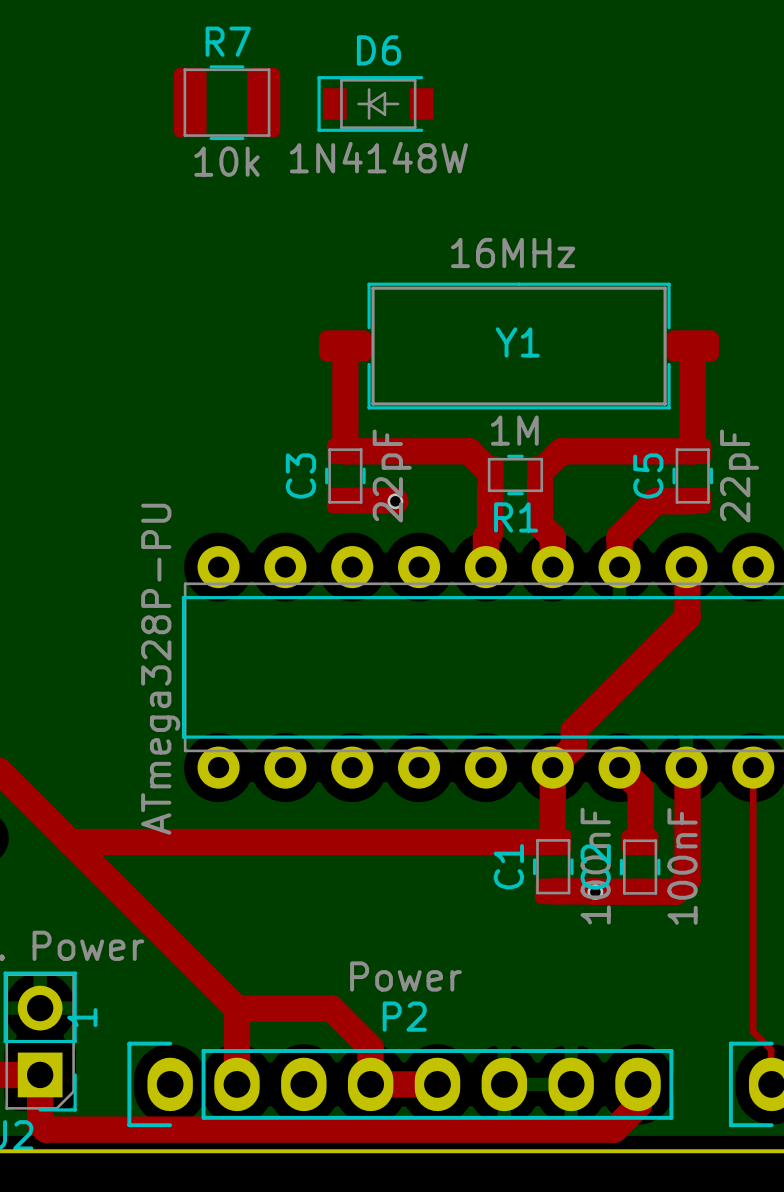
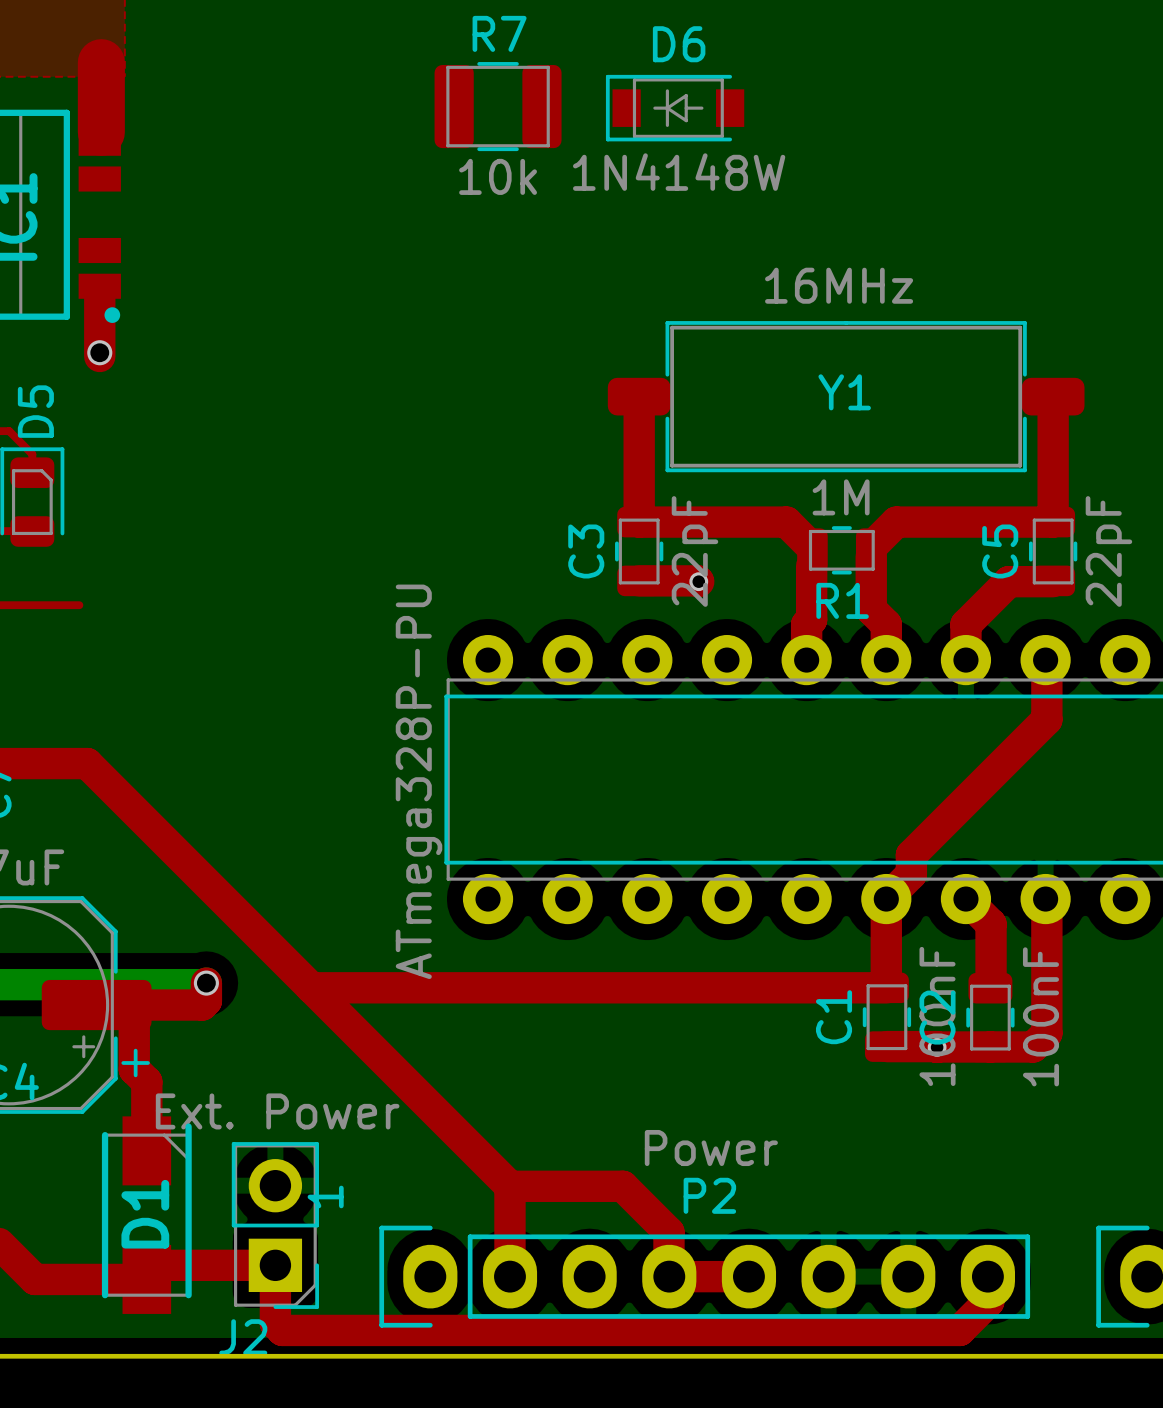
top track: (753, 767) (753, 1031) (771, 1049) (771, 1083) -> none

